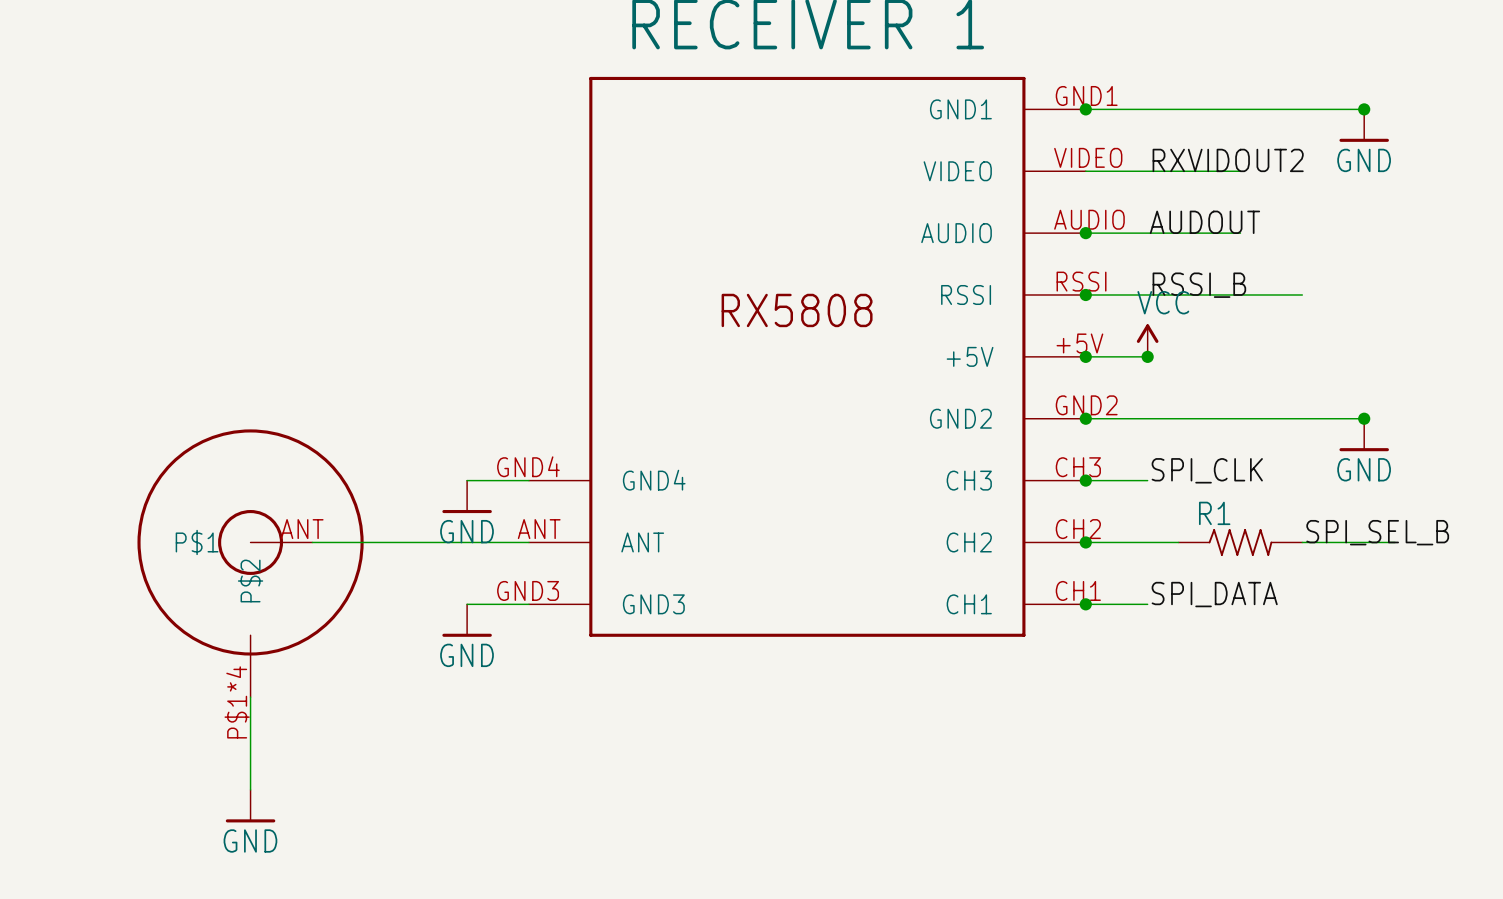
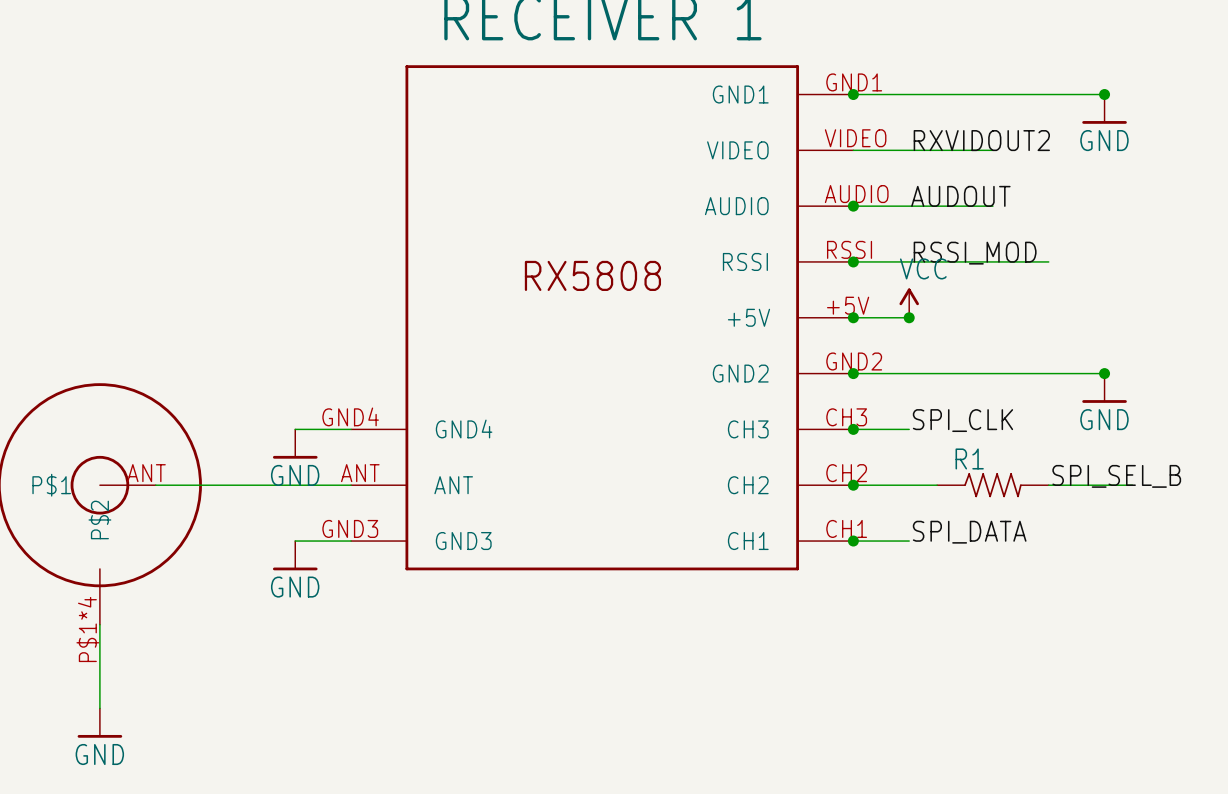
label: RSSI_B (1199, 285) -> RSSI_MOD (975, 253)

